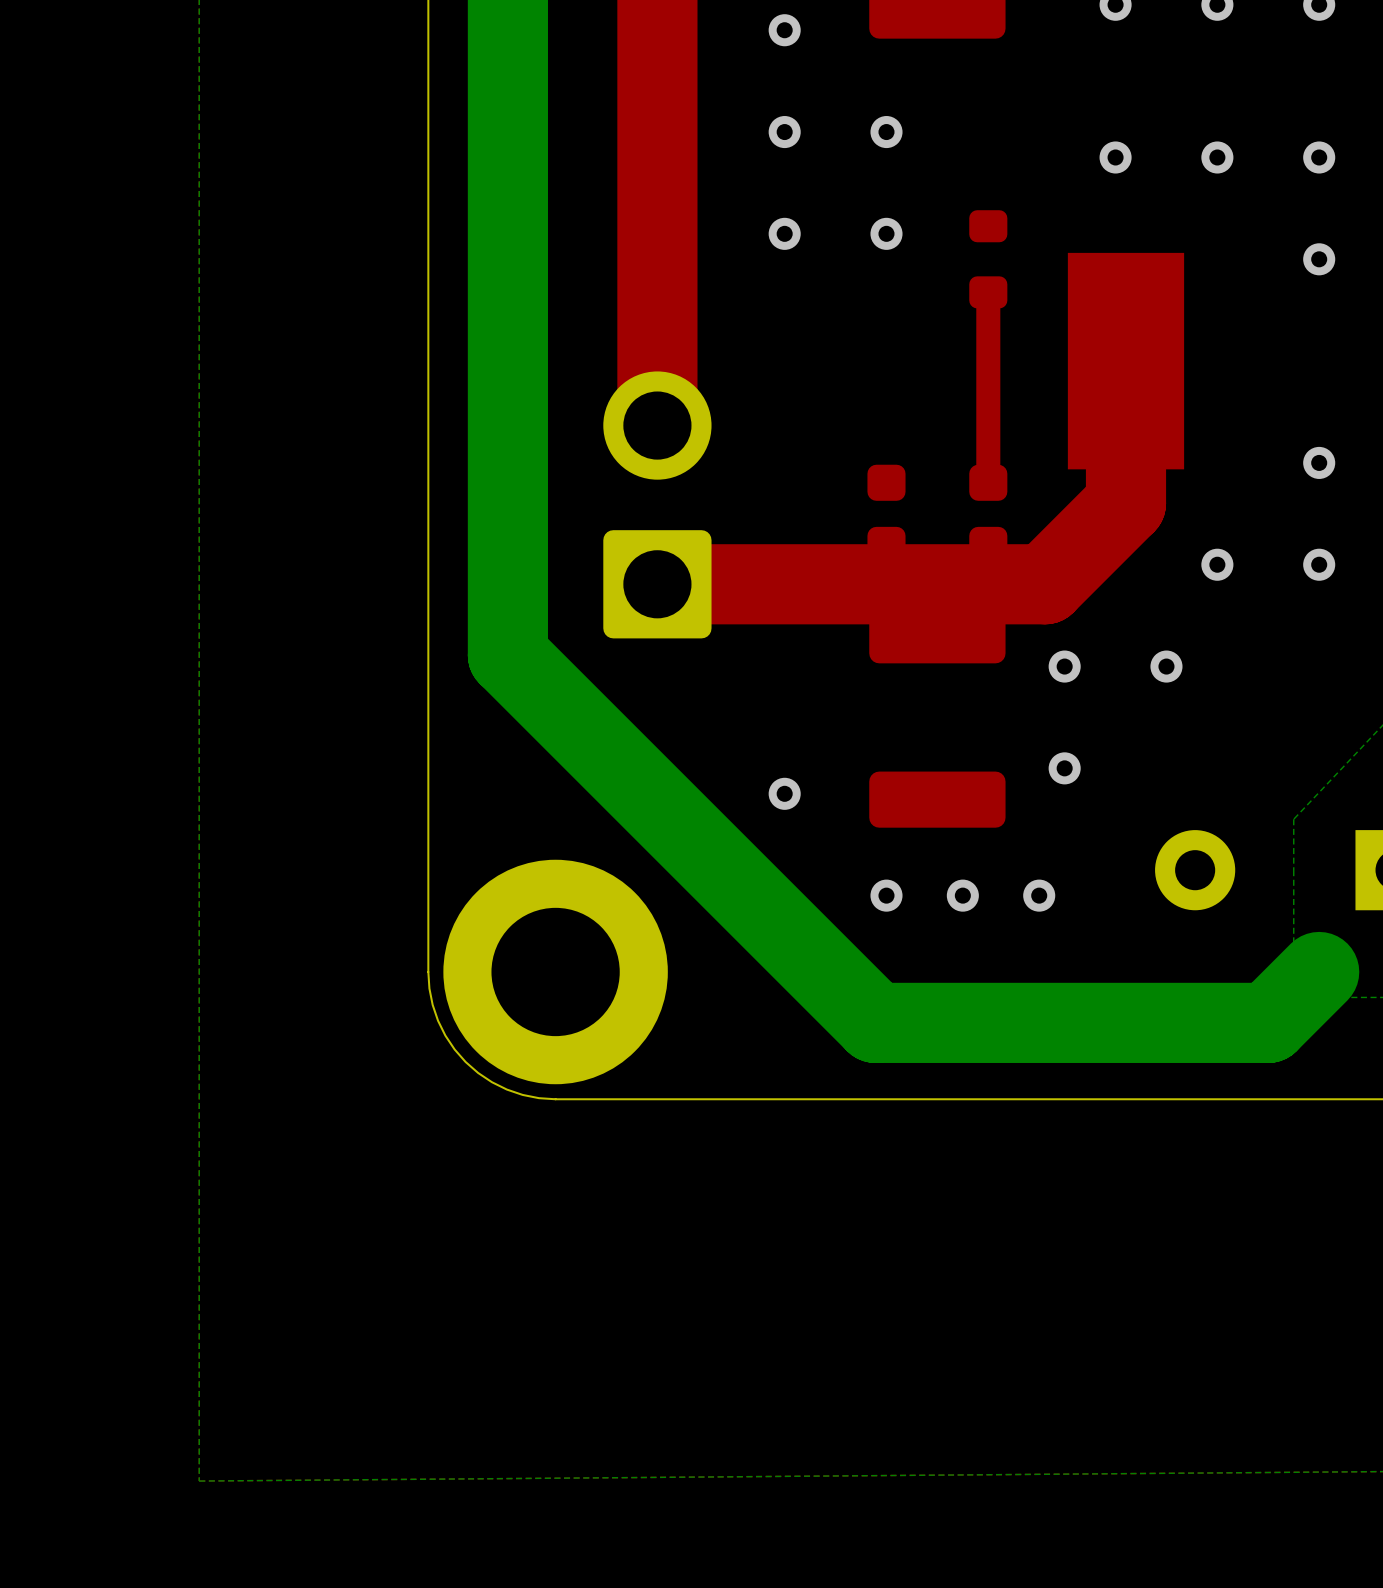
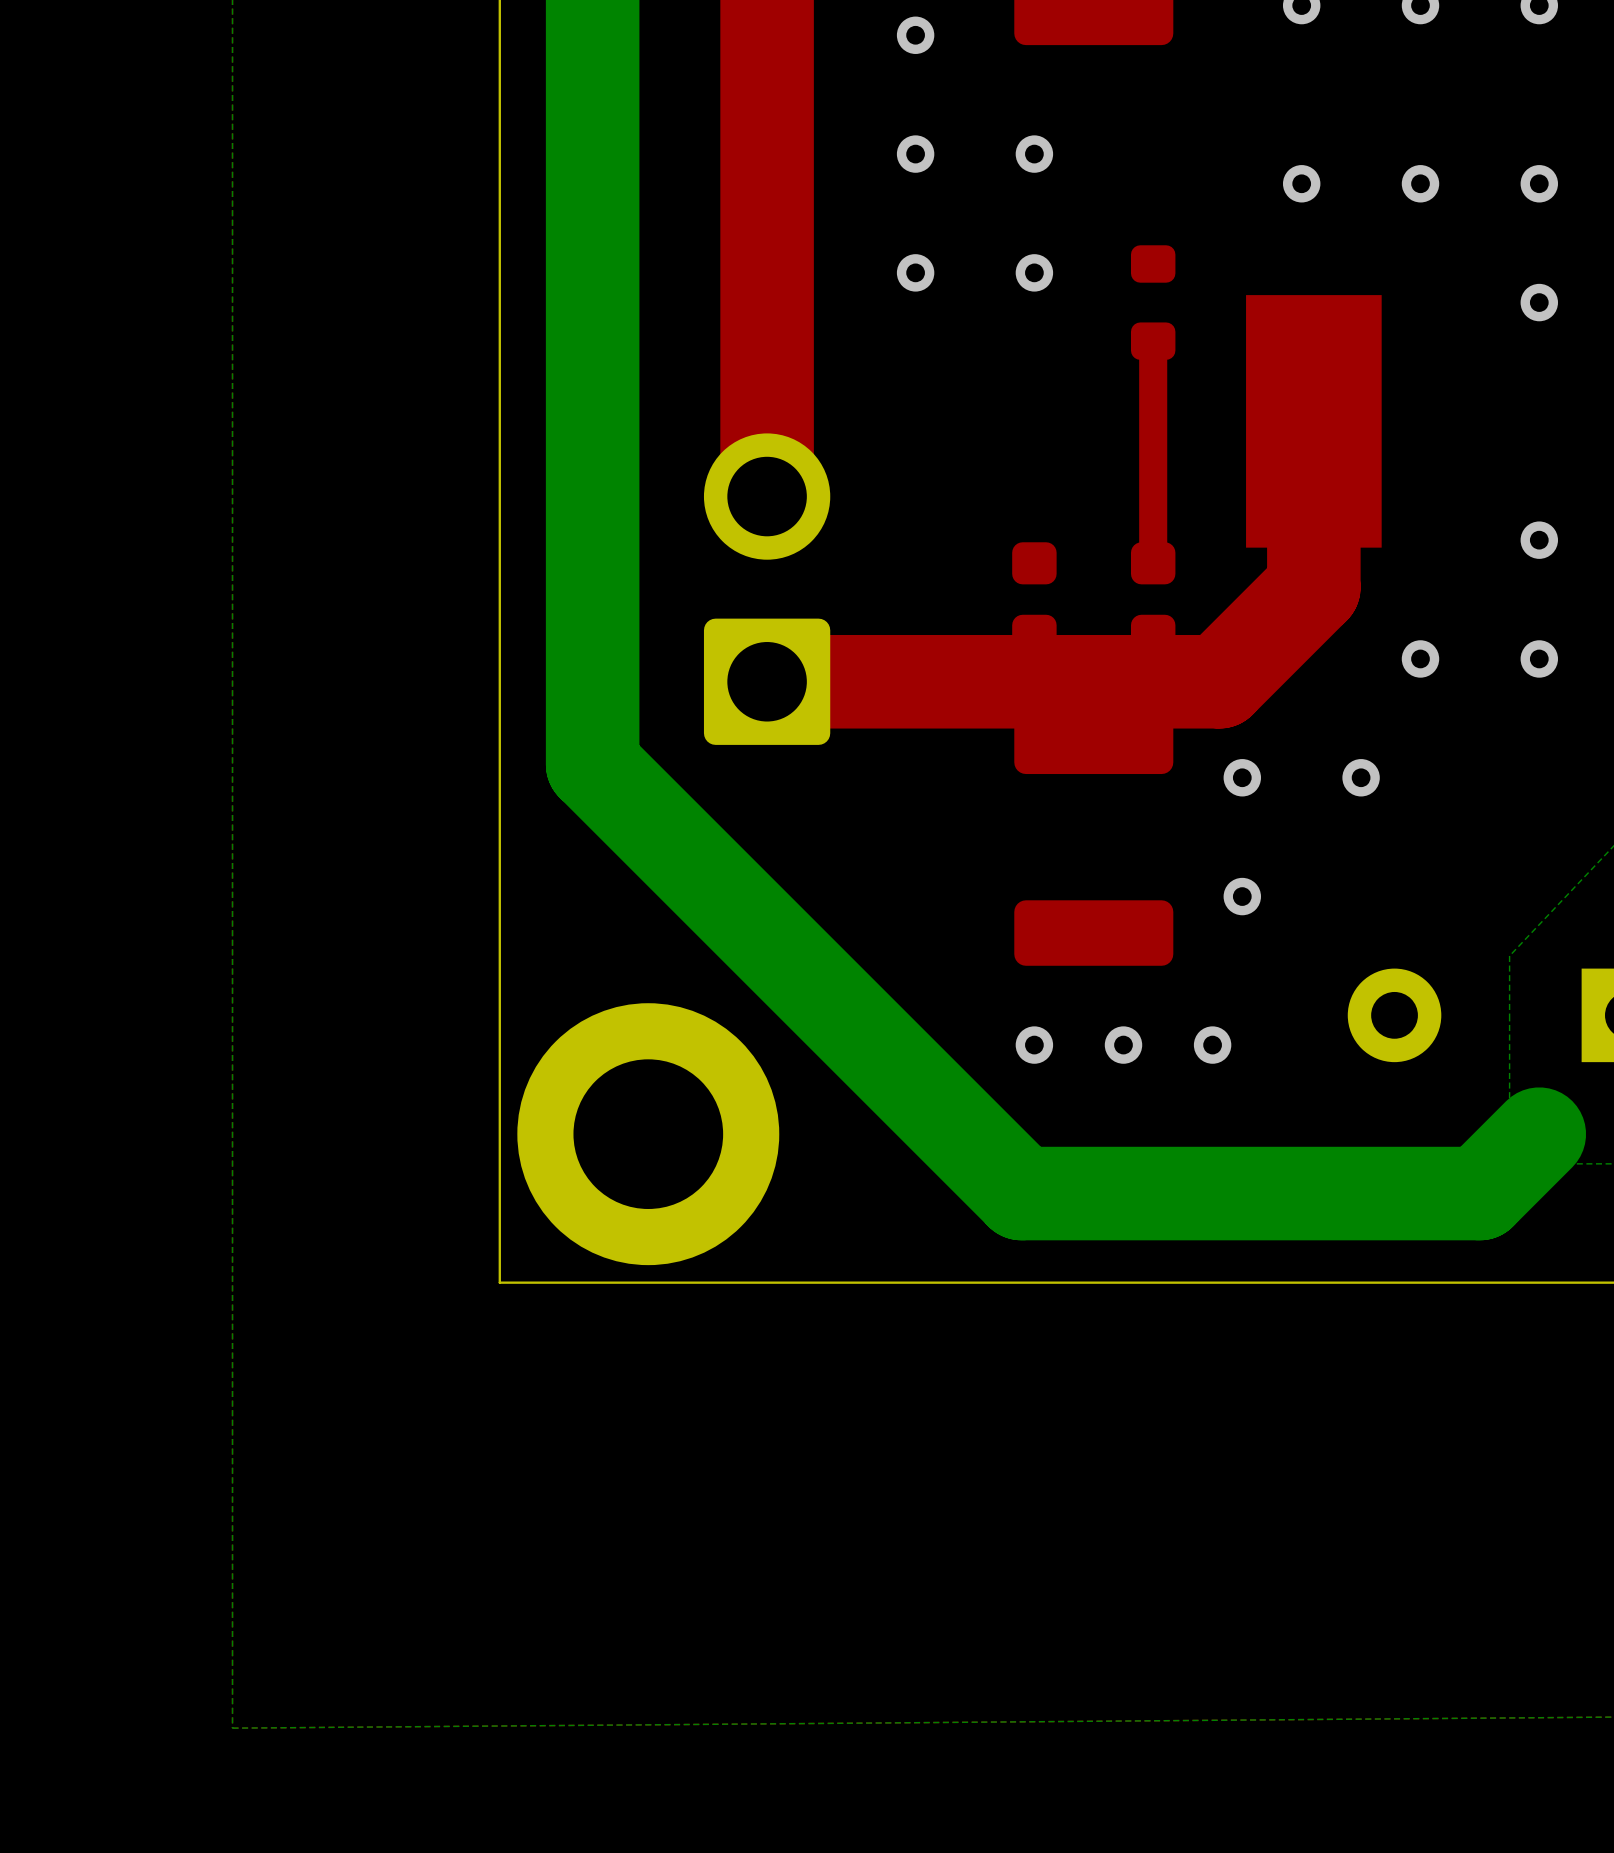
via: (784, 793) -> none
board edge: (428, 971) (429, 988) (438, 1020) (454, 1049) (465, 1061) (491, 1082) (506, 1089) (522, 1094) (555, 1099) -> (499, 1134) (499, 1282) (648, 1282)

